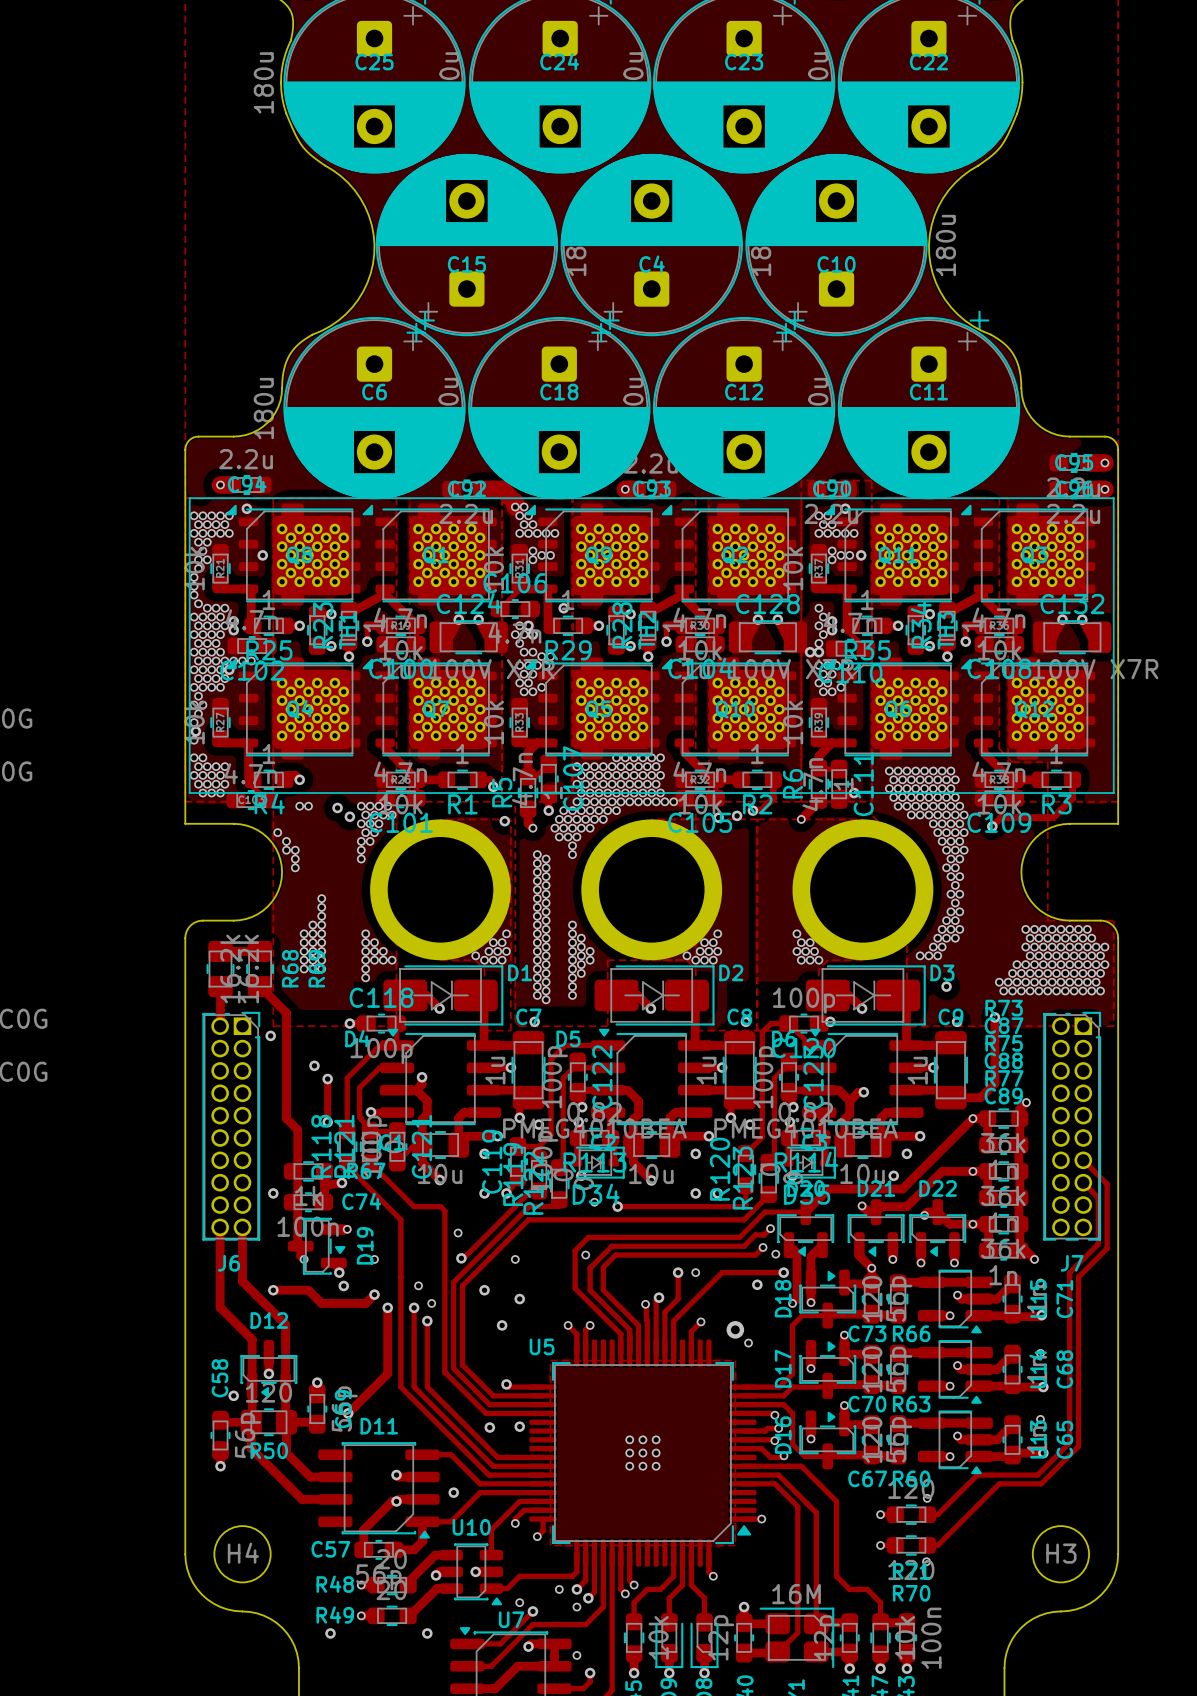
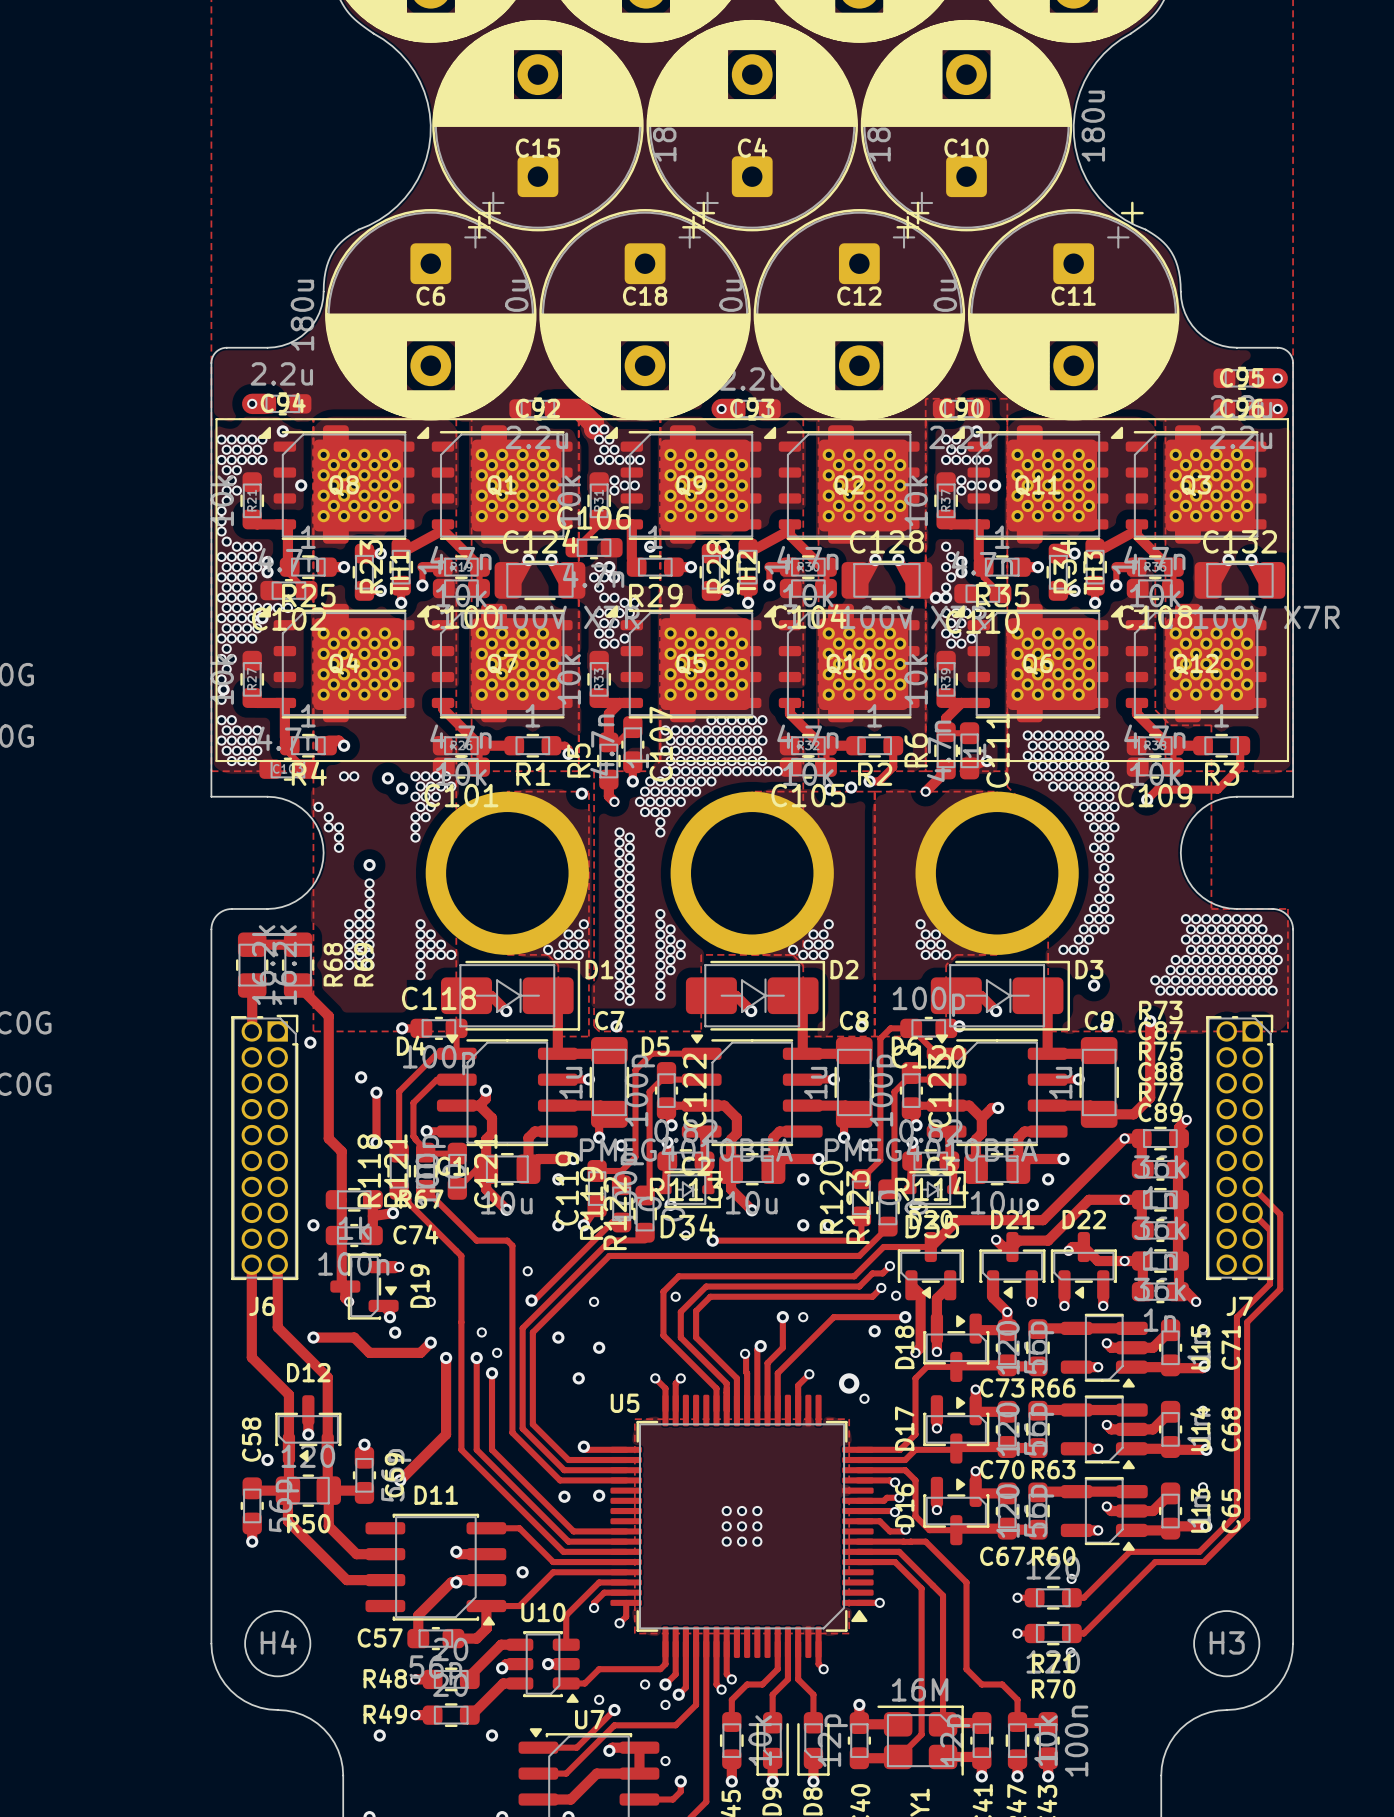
via: none -> (369, 865)

